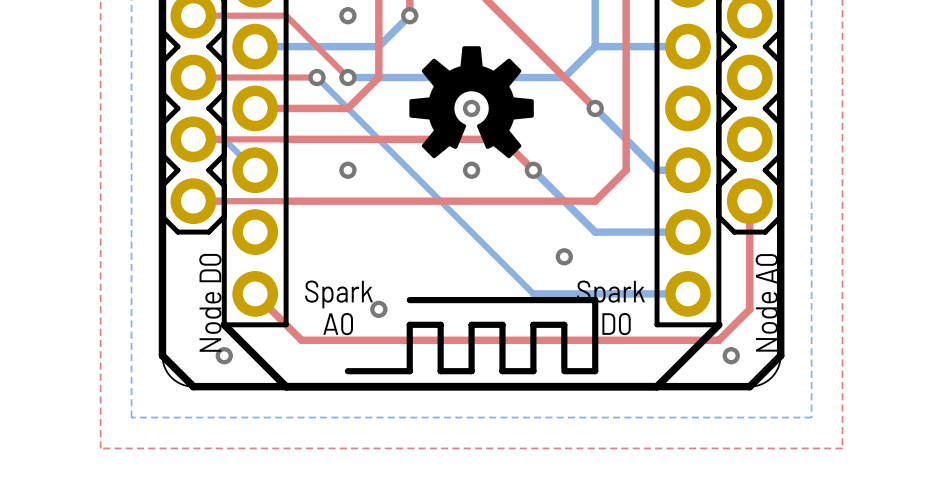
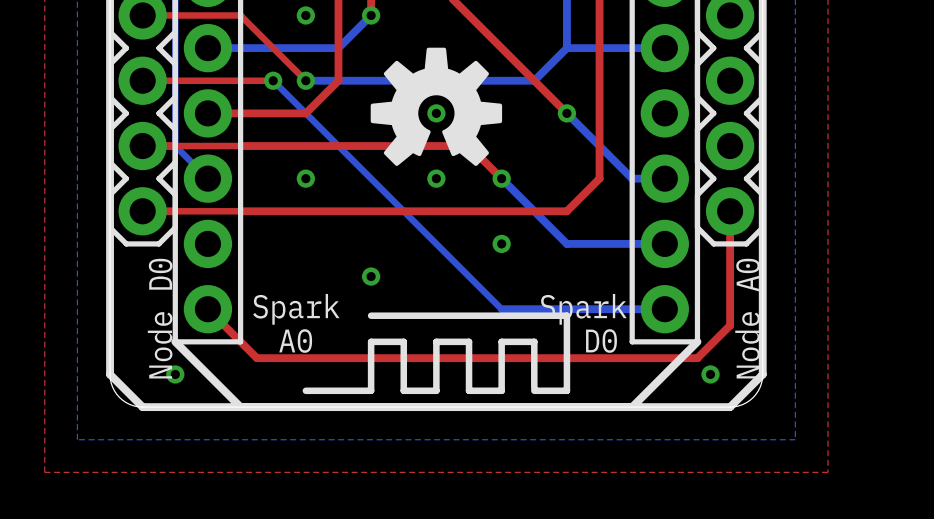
via position: (564, 256) -> (501, 243)
via position: (378, 309) -> (371, 276)

